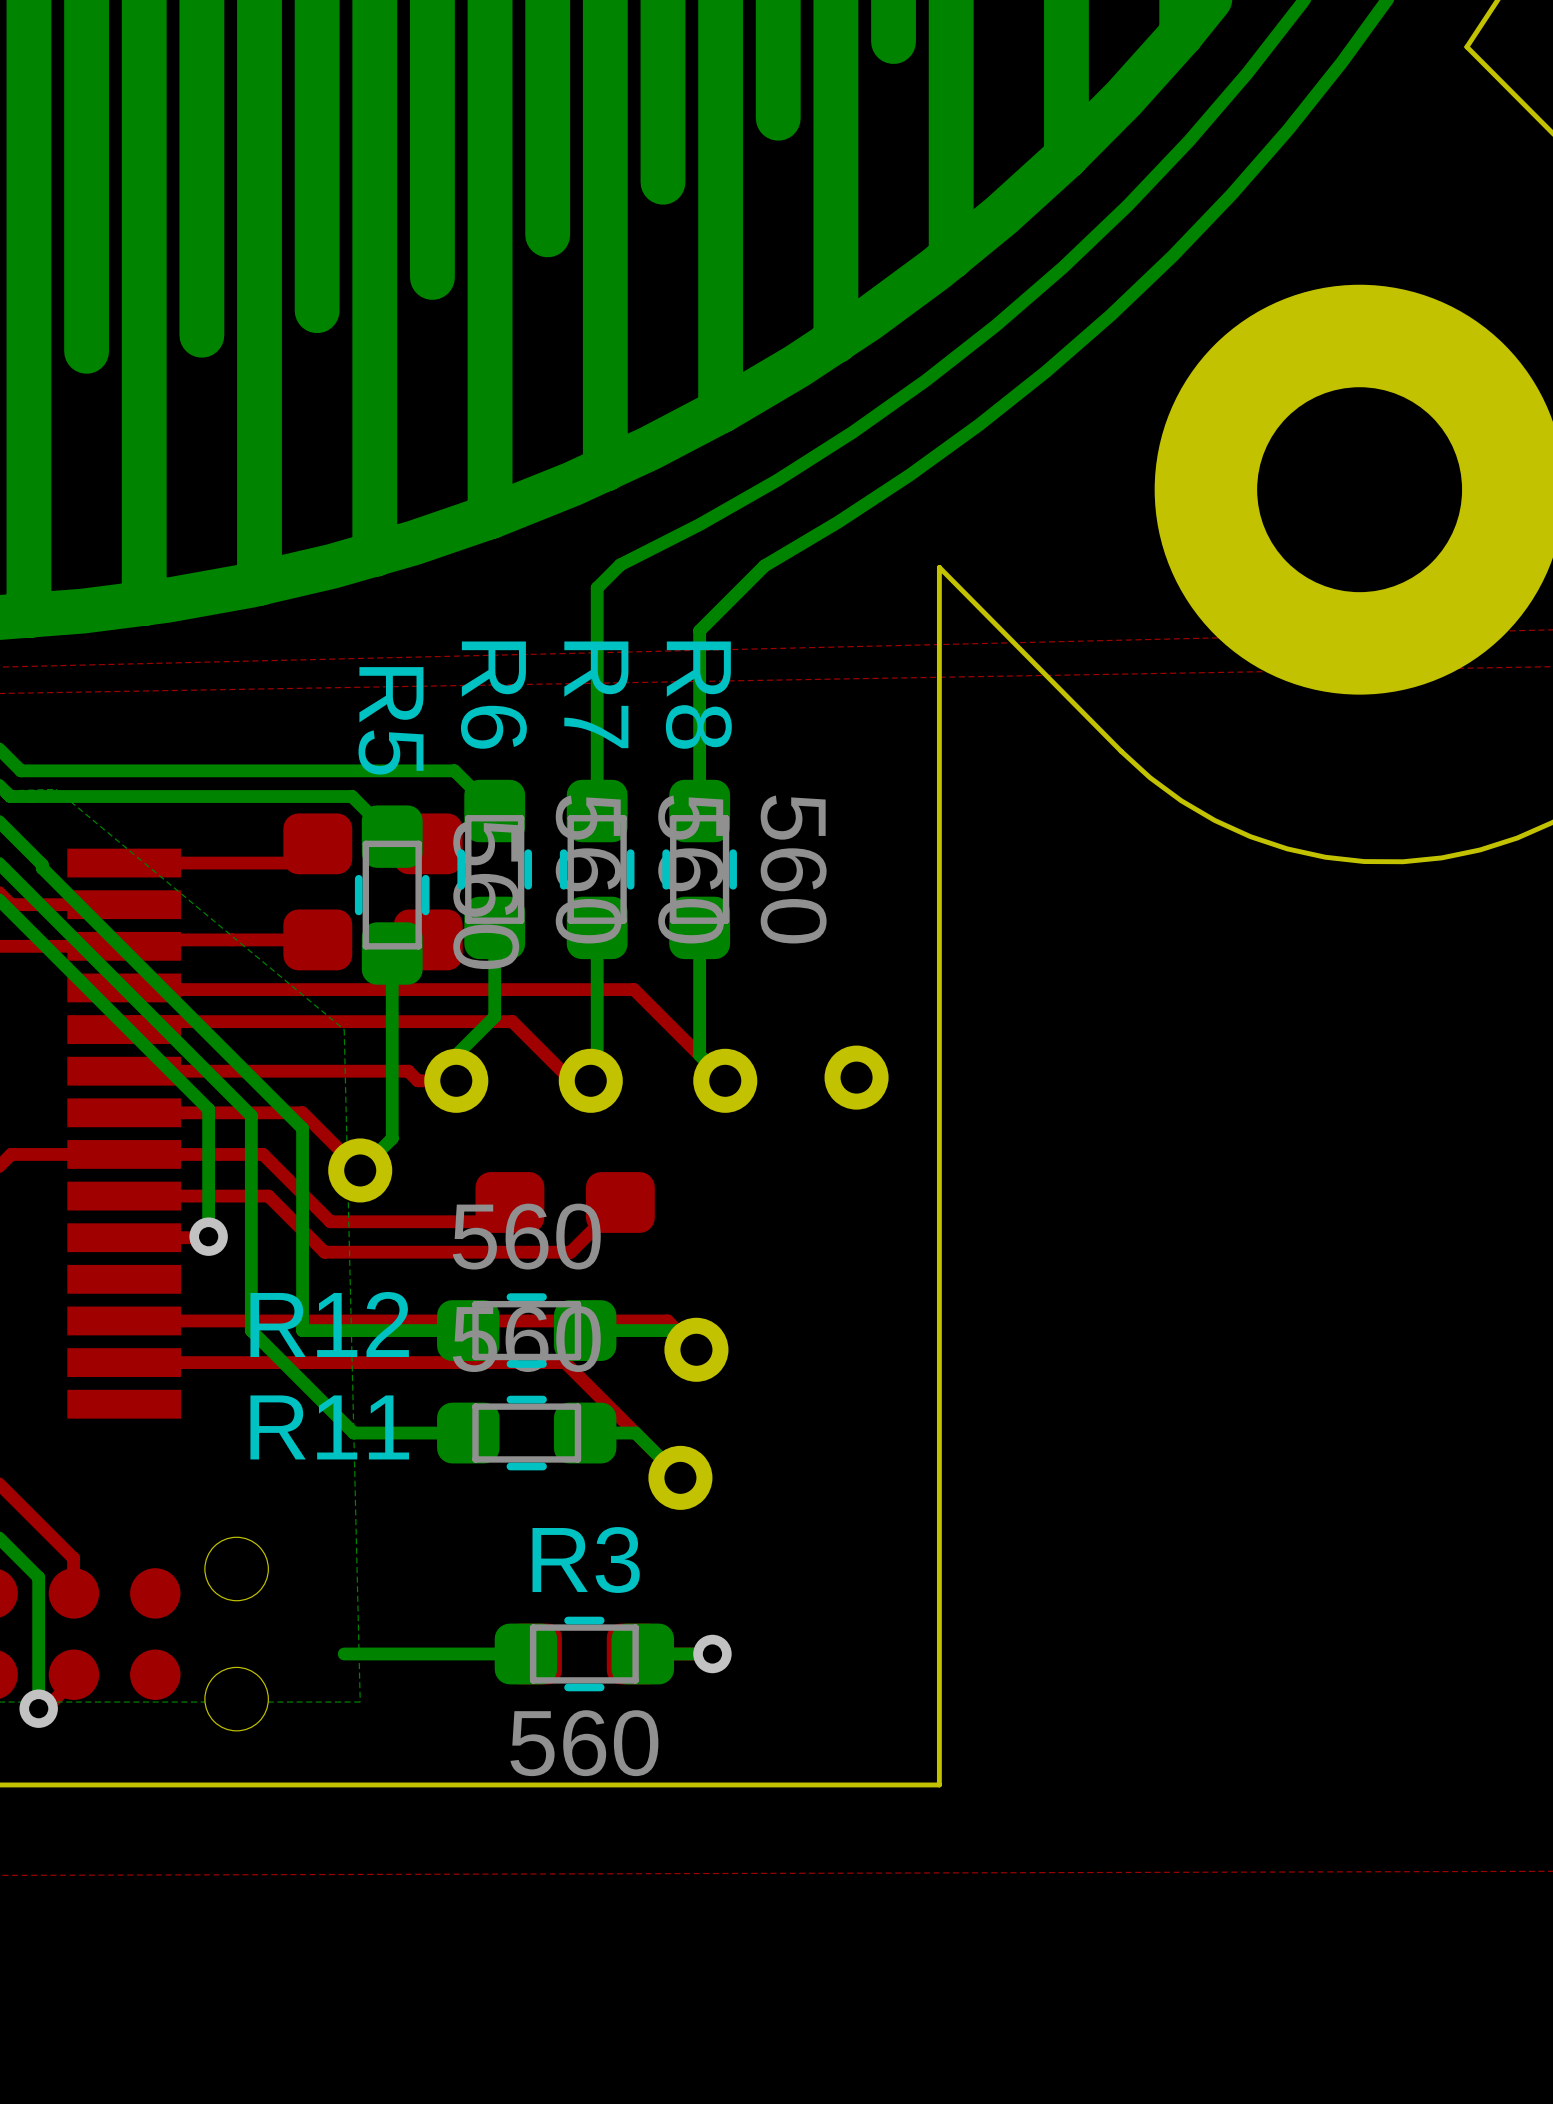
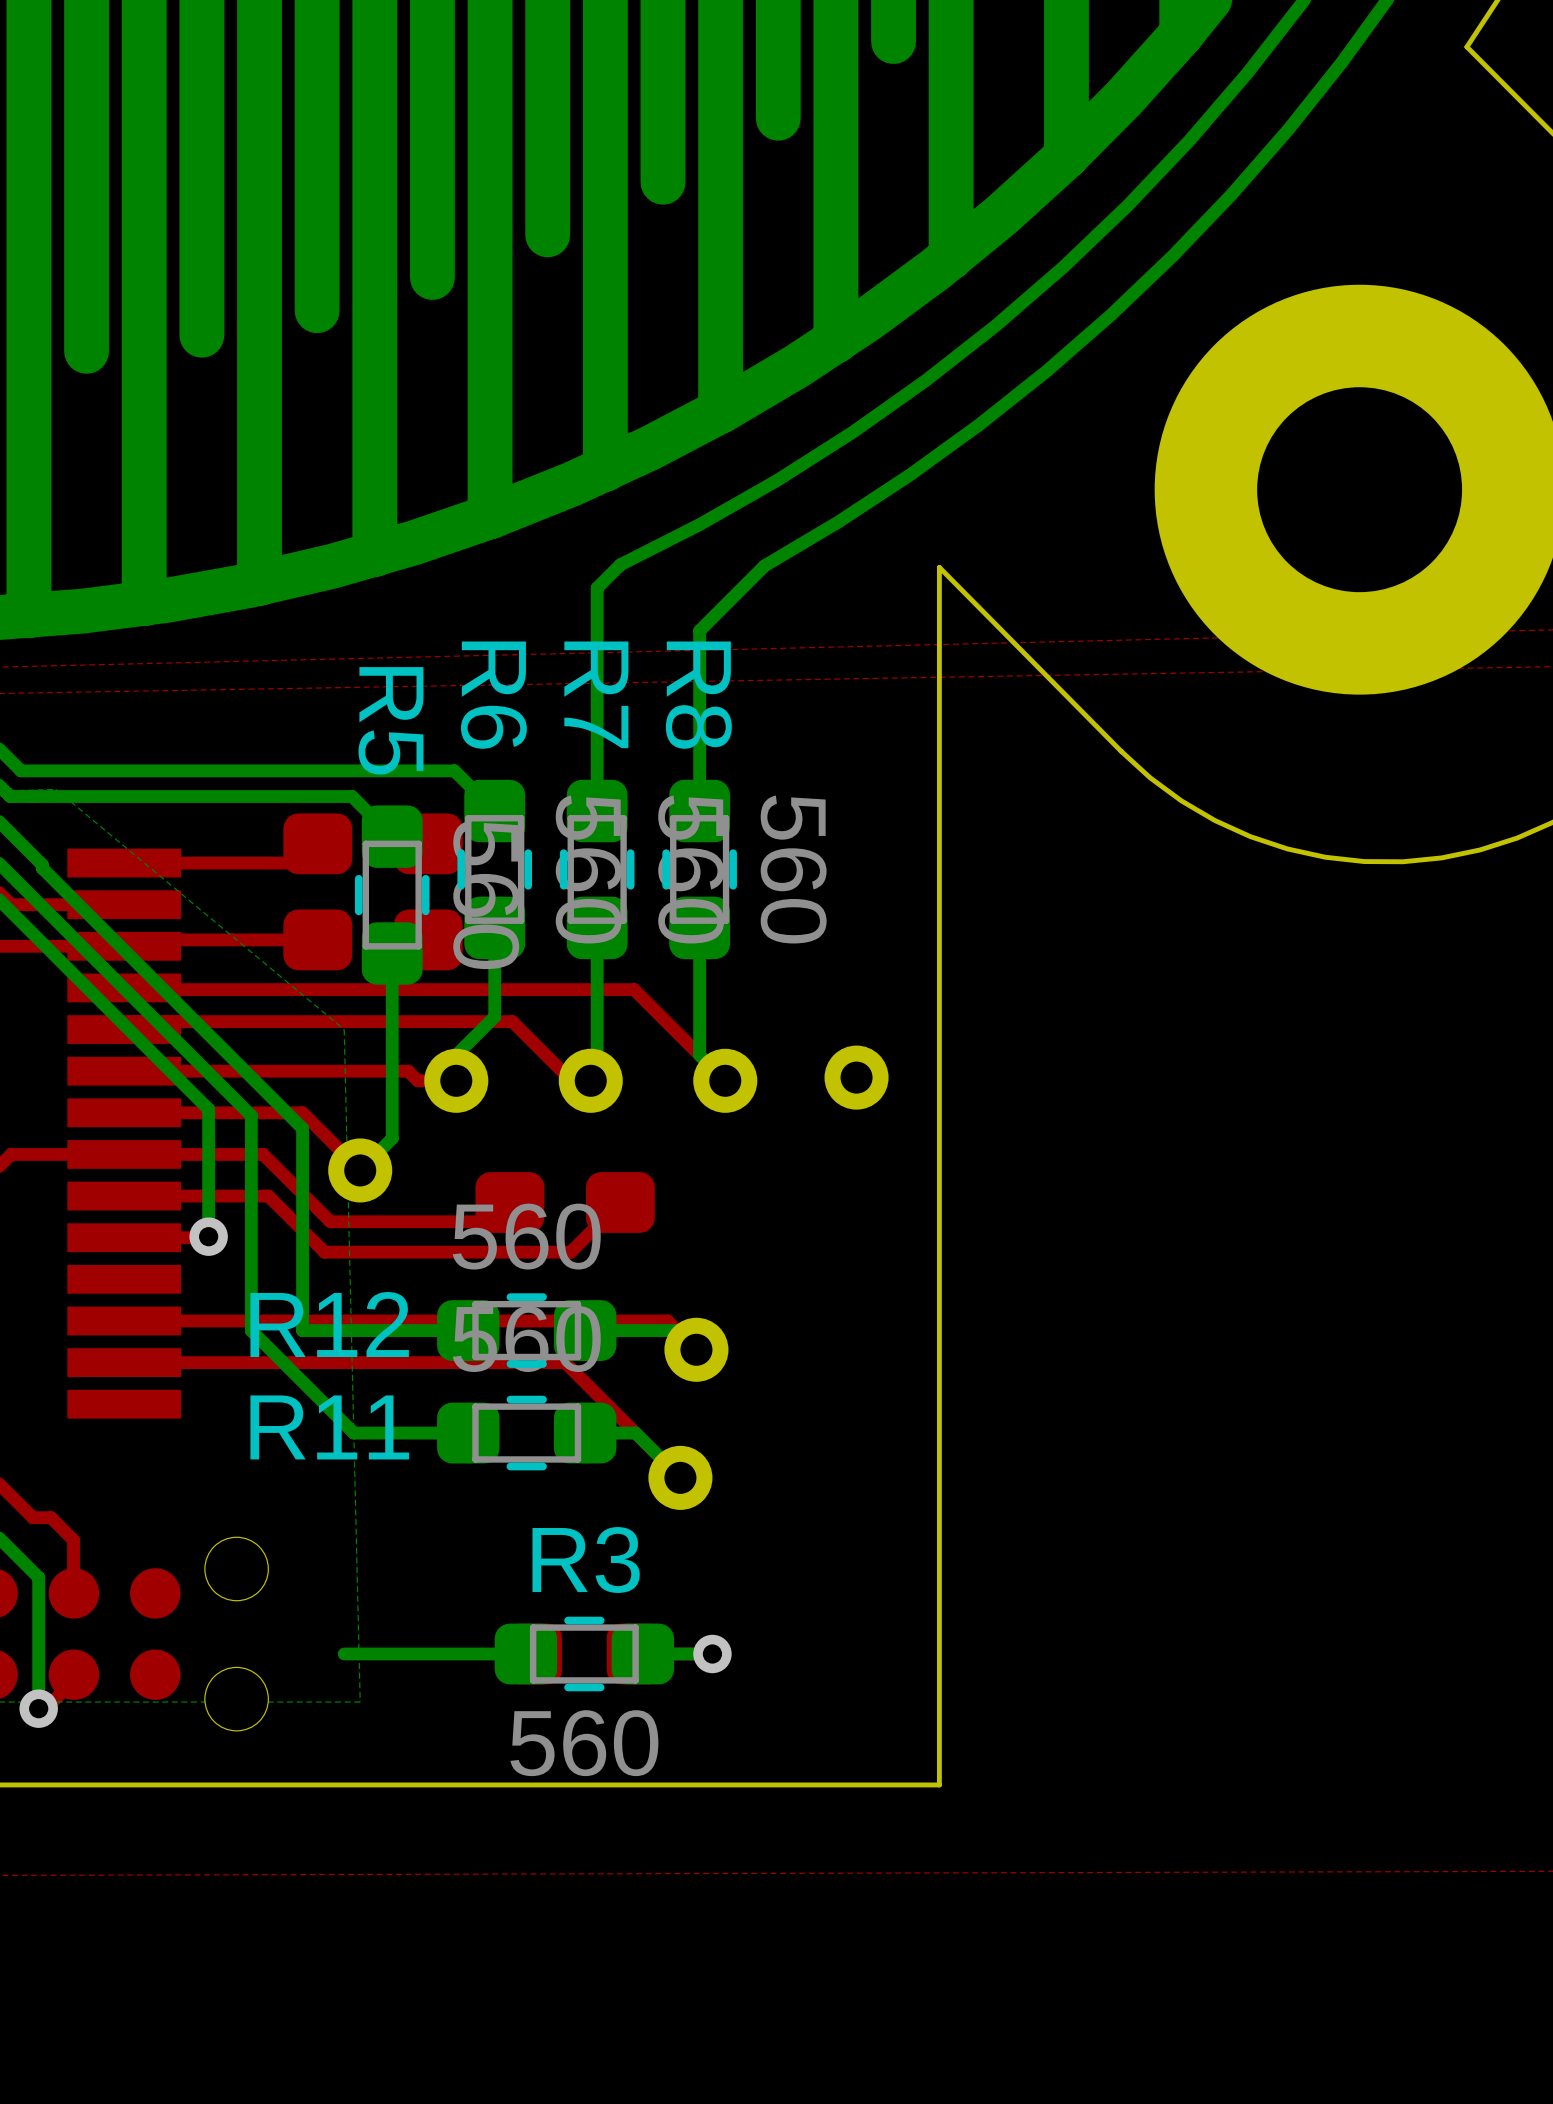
top track: (32, 1517) (73, 1558) -> (32, 1517) (50, 1517) (73, 1540) (73, 1558)

